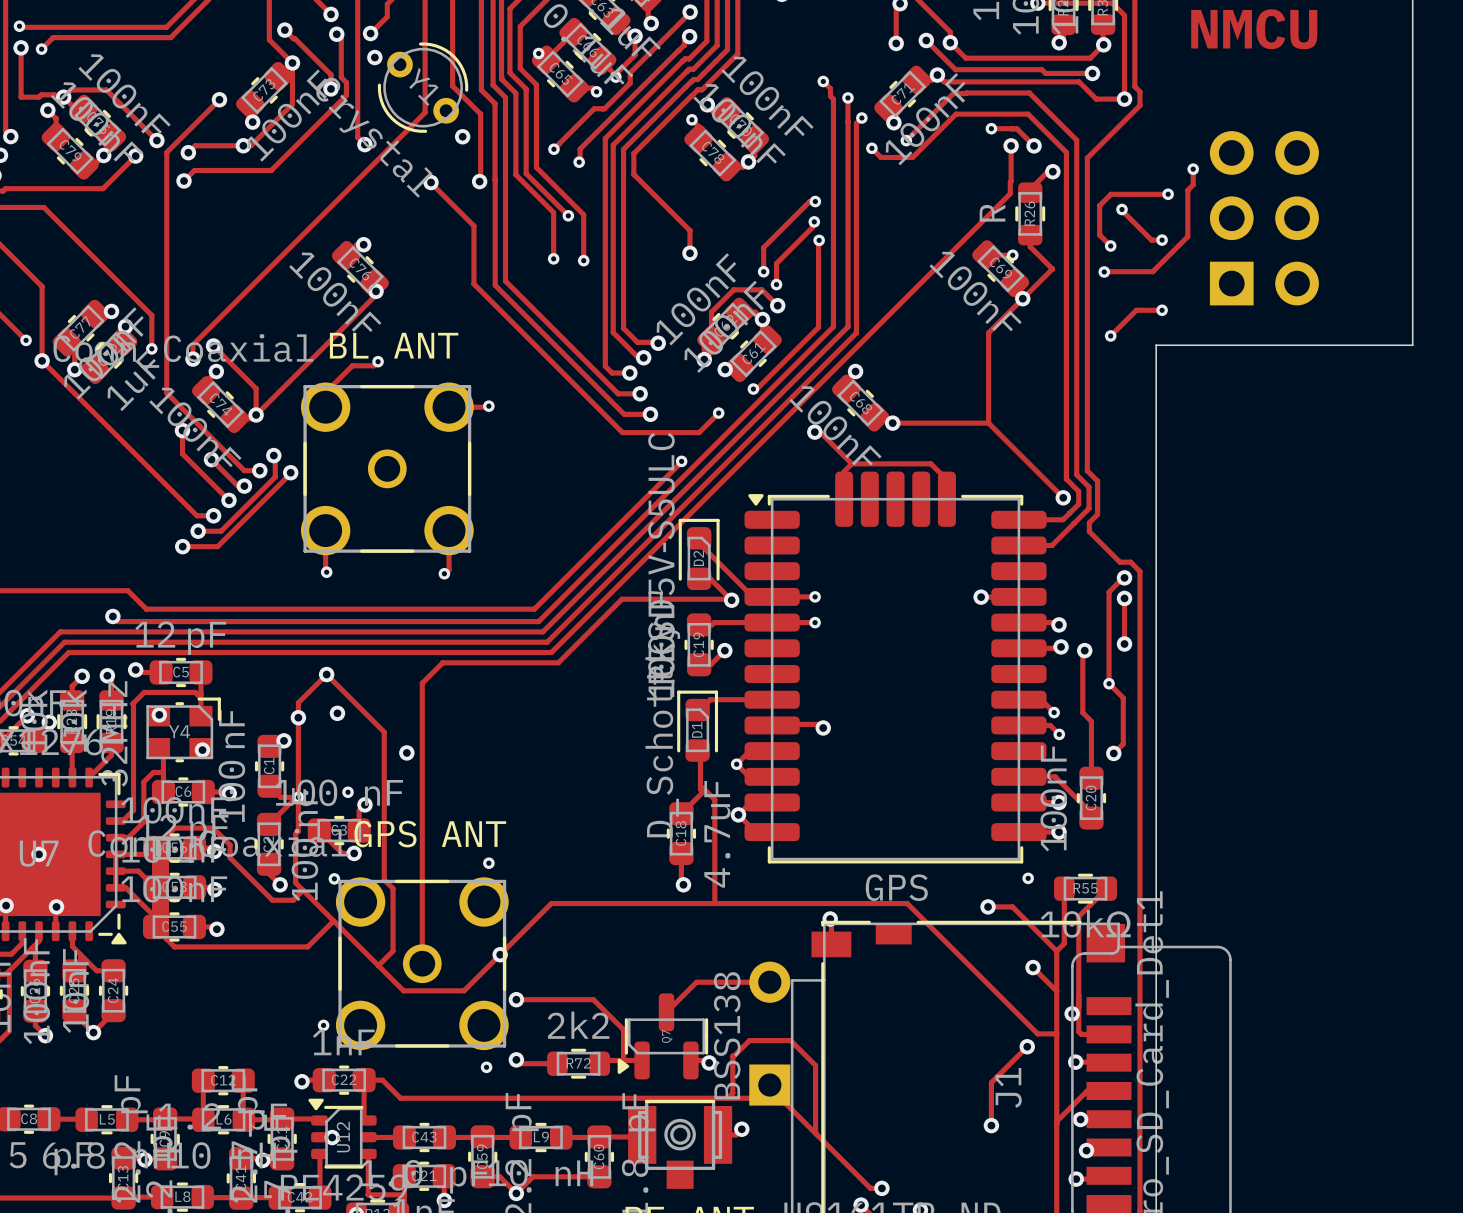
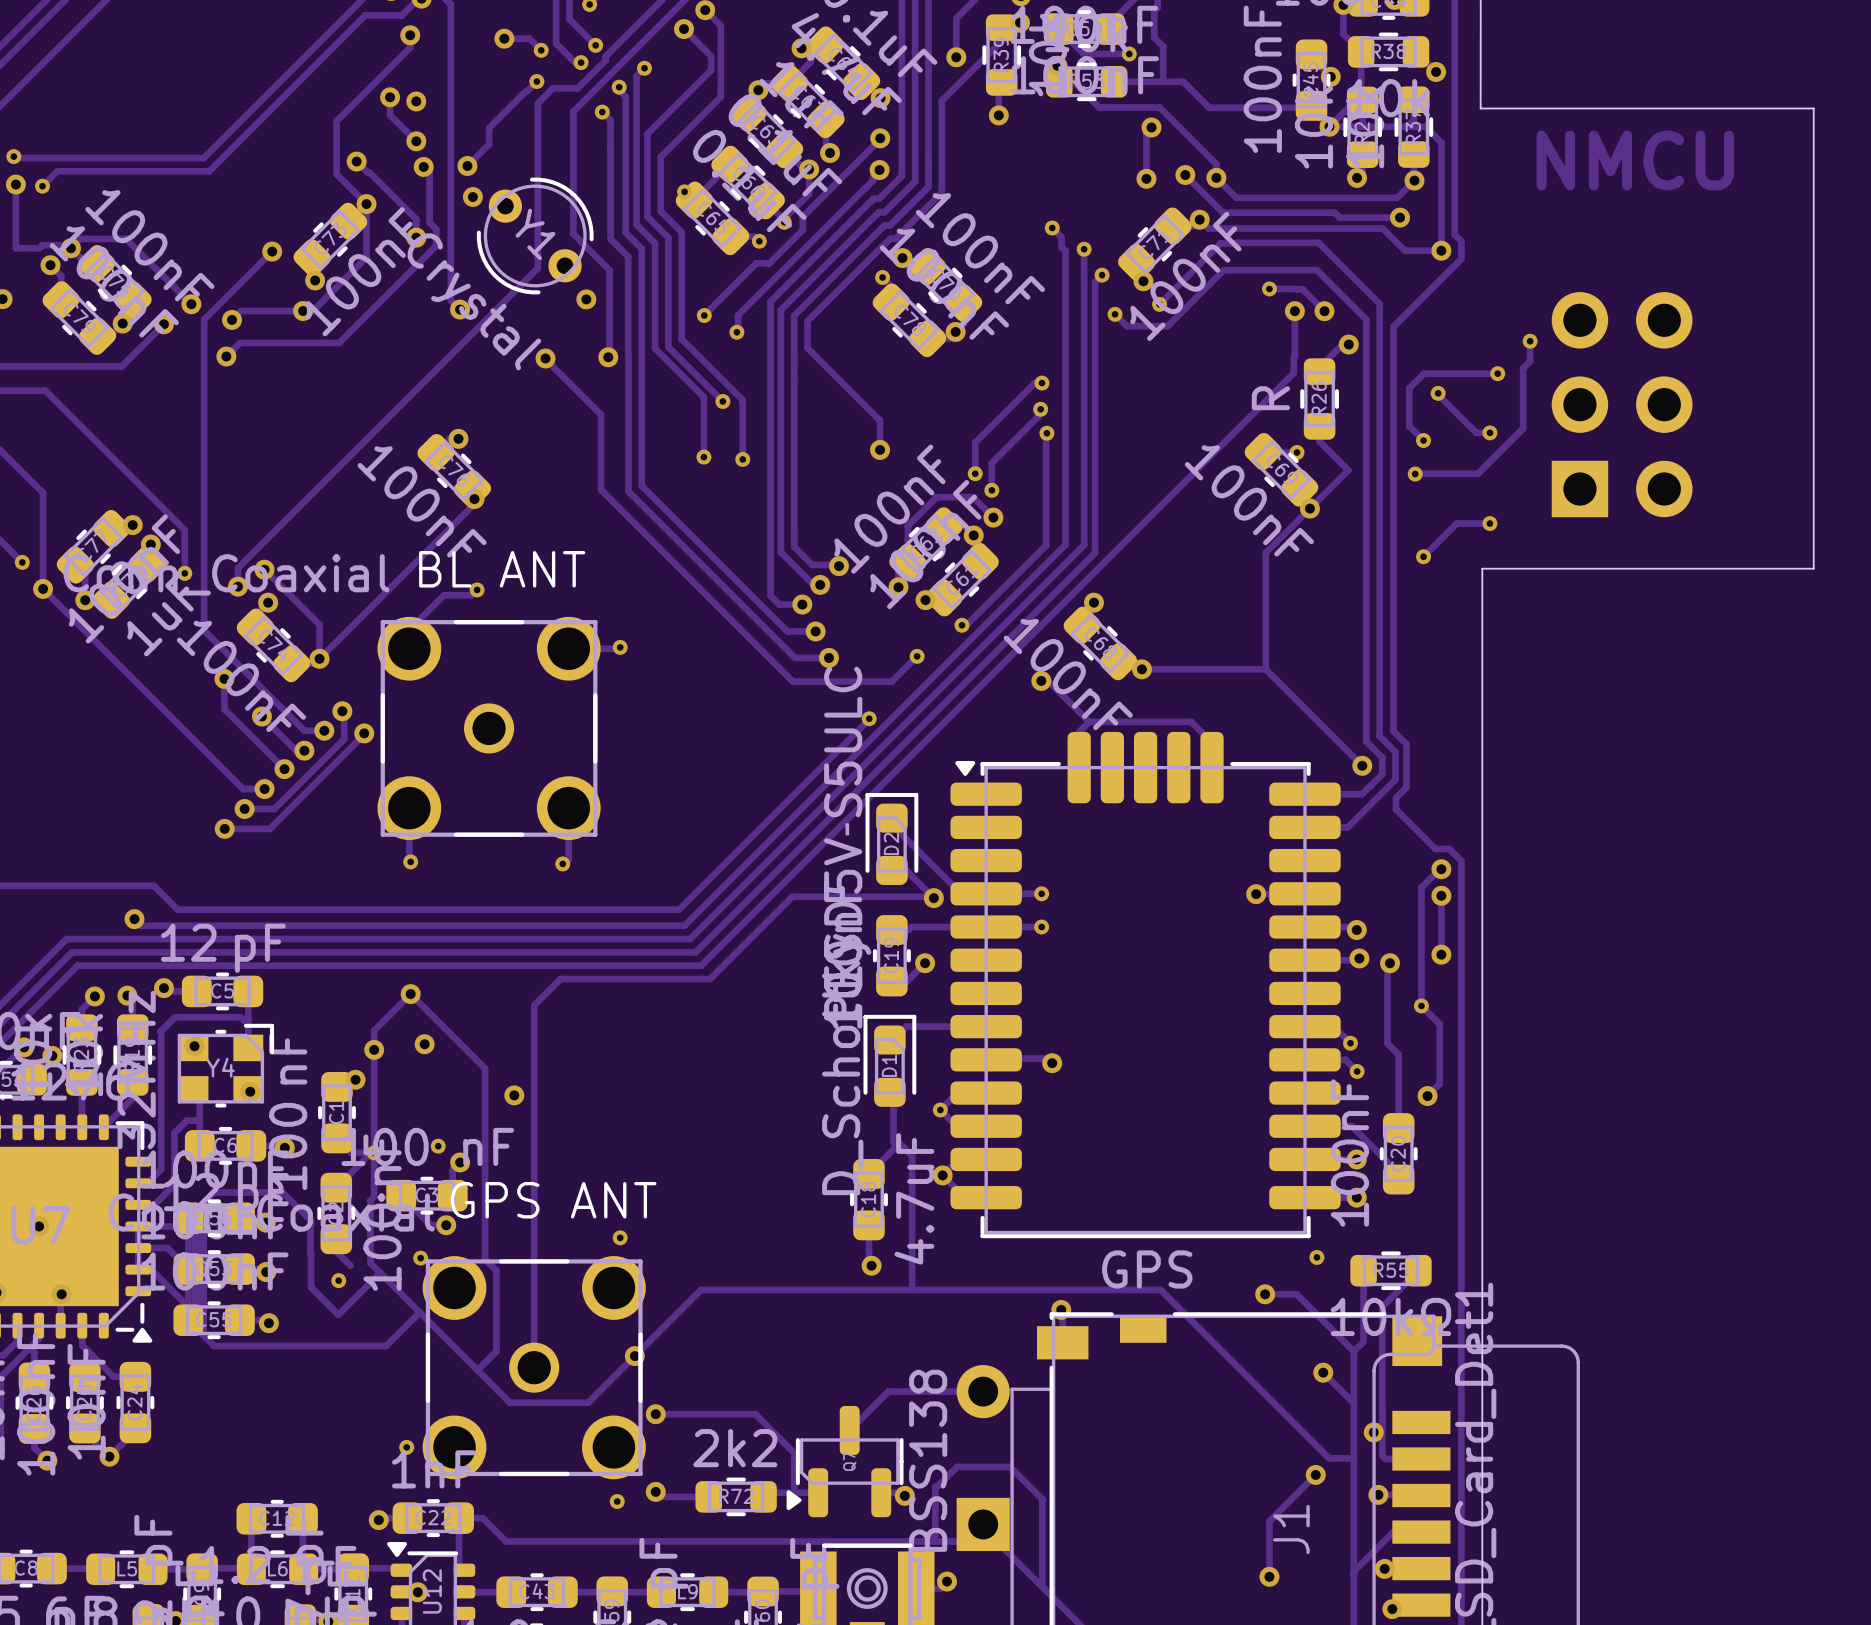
track: (213, 828) (230, 844) (230, 857) (272, 900) (293, 900) -> (264, 1192) (282, 1192) (311, 1220) (311, 1287) (338, 1314) (367, 1285)
via position: (280, 884) -> (338, 1280)

